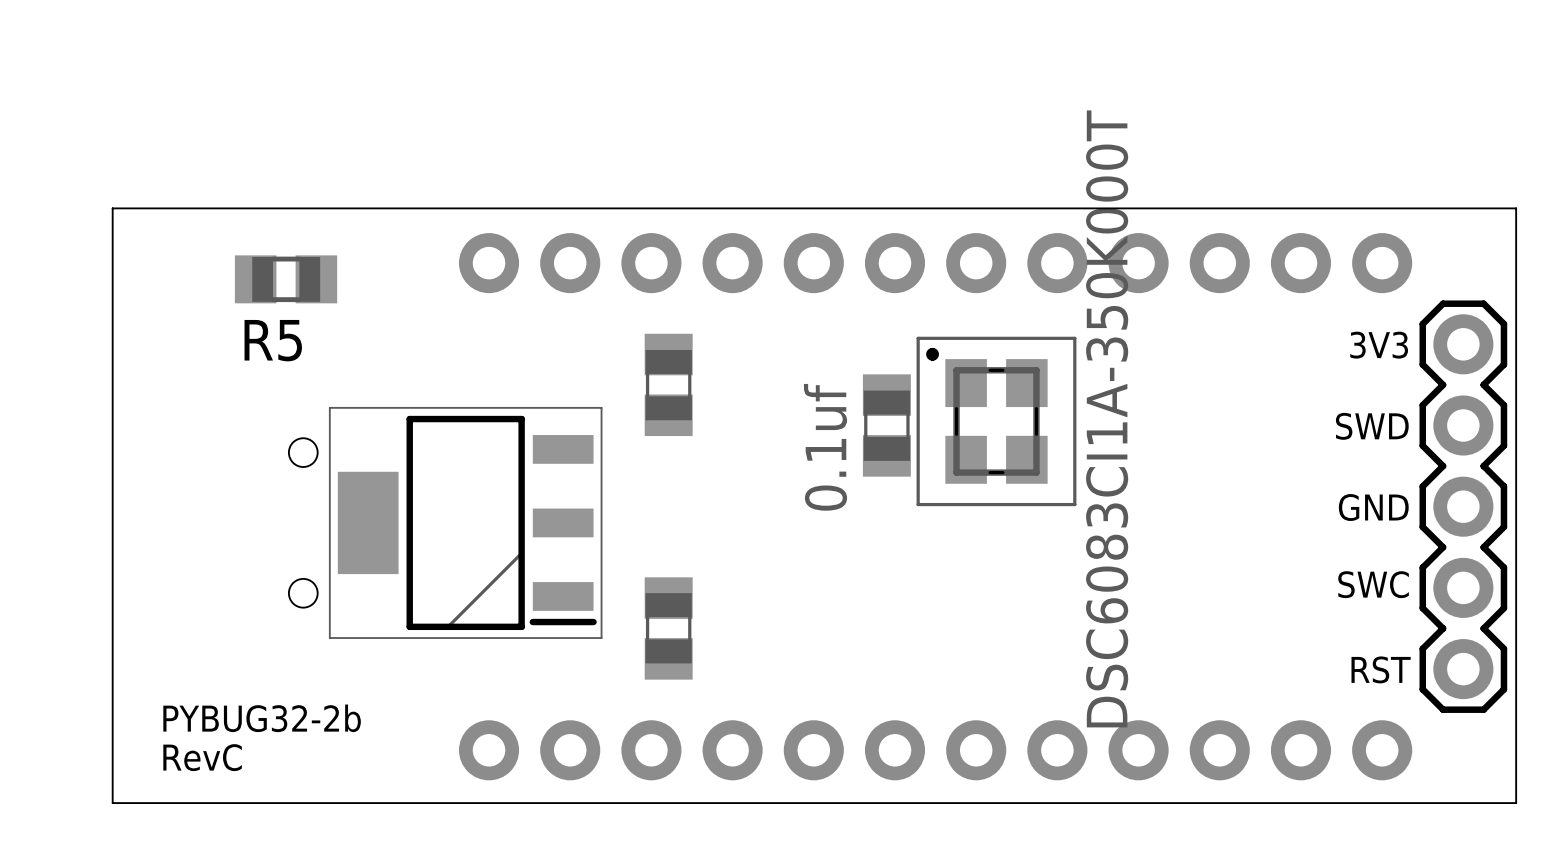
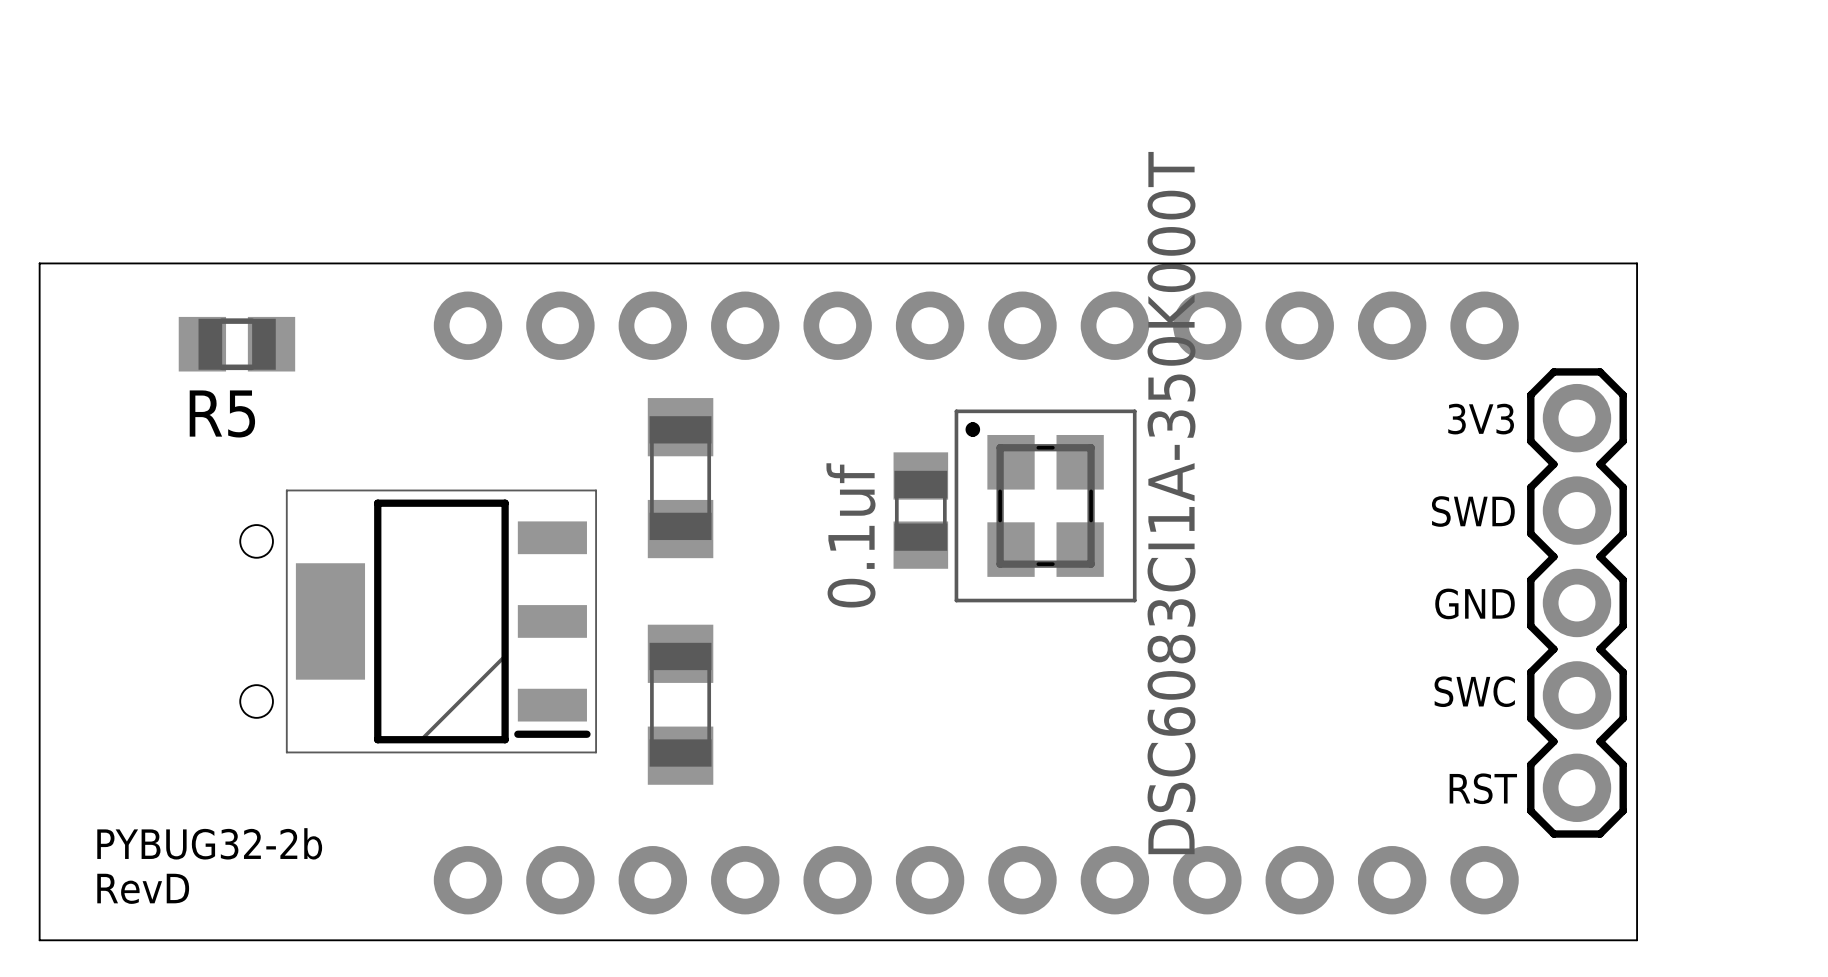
part footprint: [644, 333, 693, 437] -> [647, 398, 714, 559]
part: none -> (680, 704)
part: (668, 628) -> none
text: RevC (202, 757) -> RevD (143, 888)

